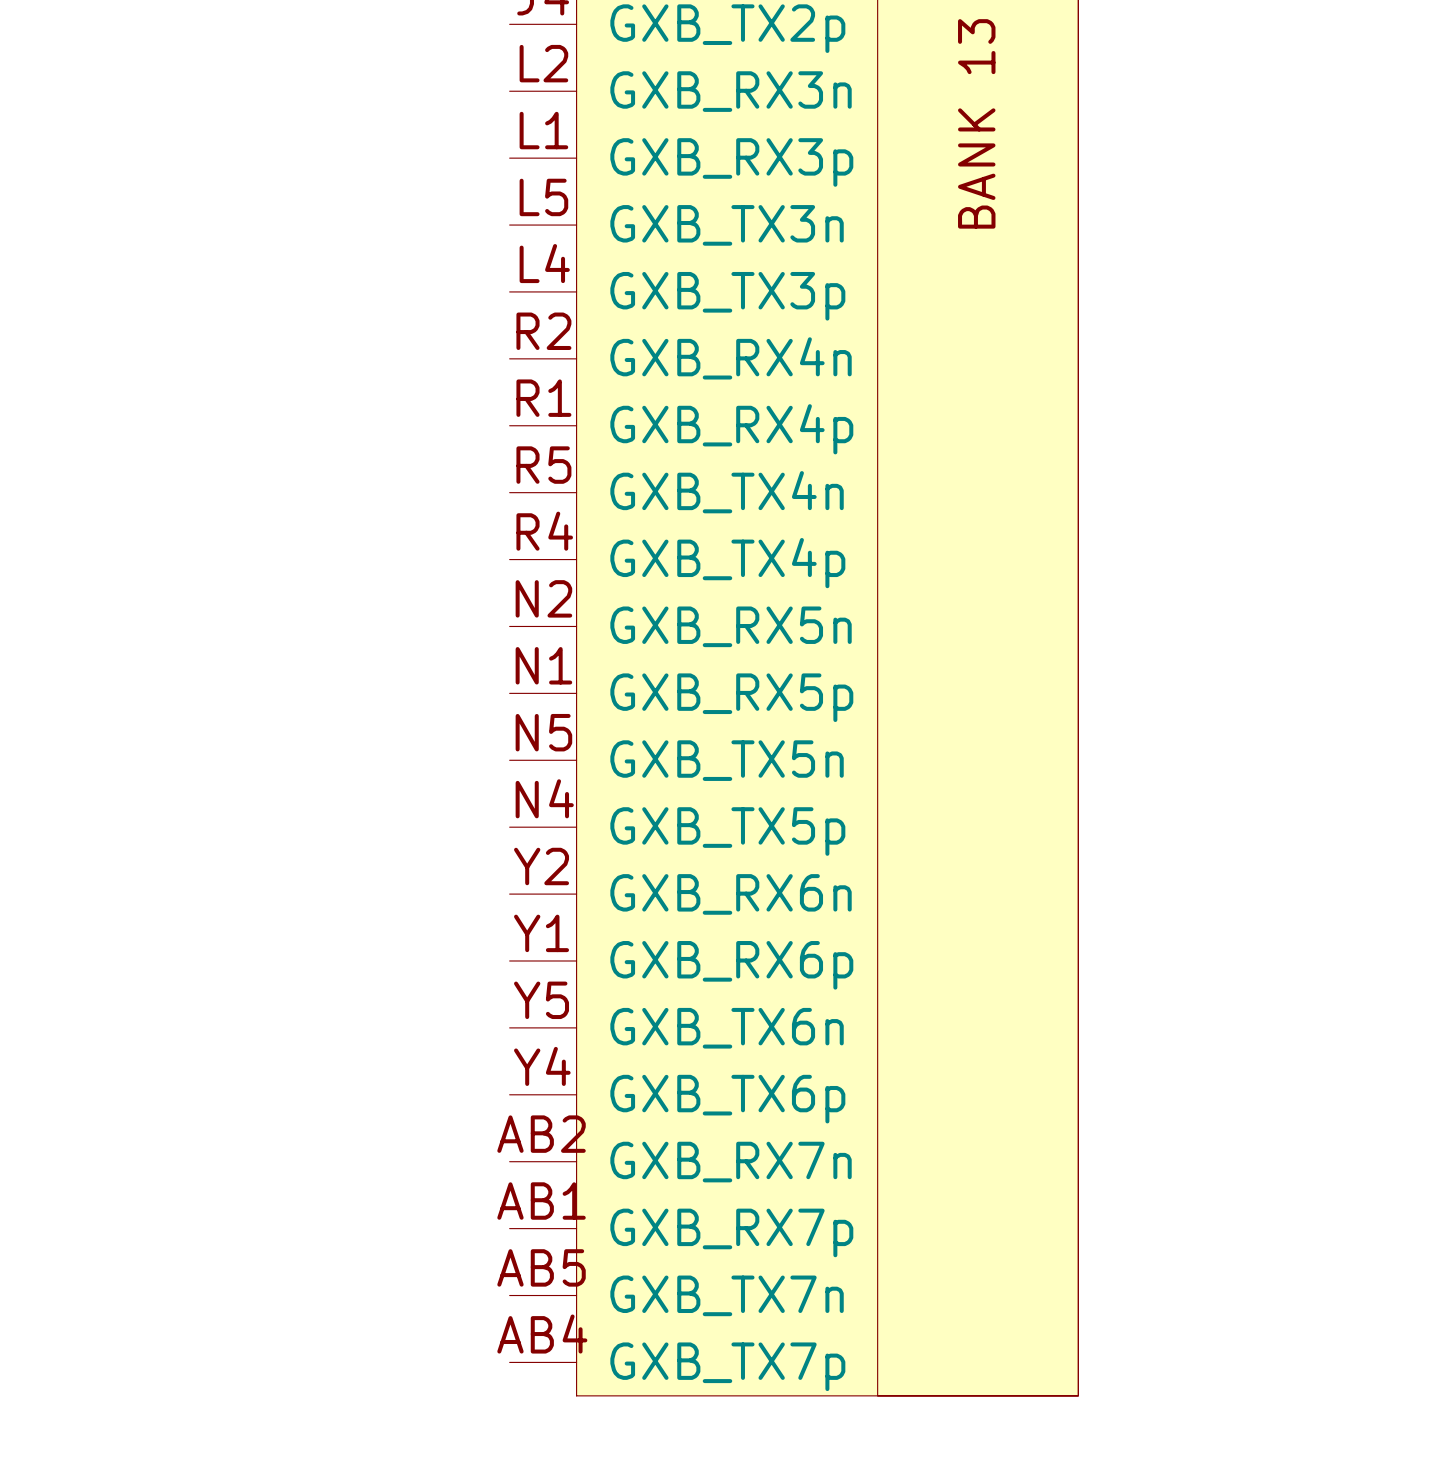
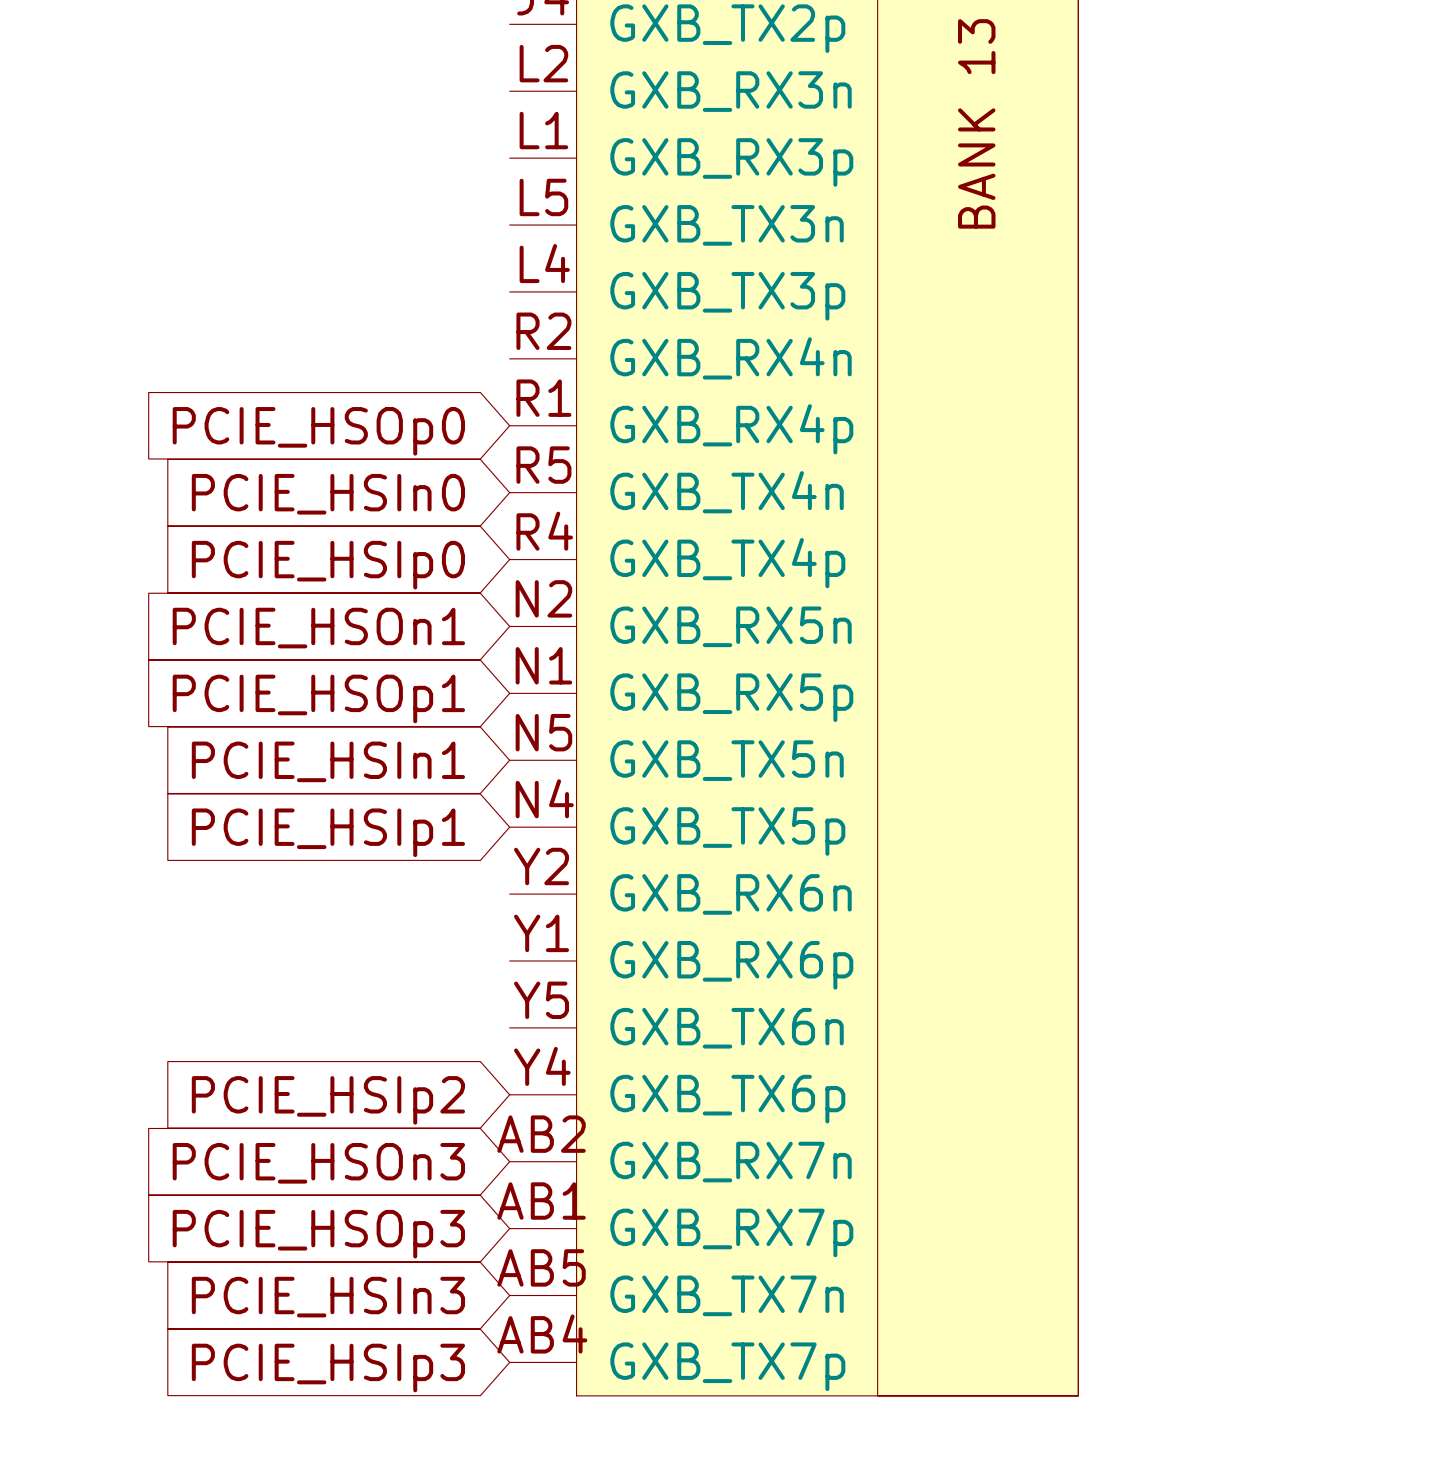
global label: none -> PCIE_HSOp0 (318, 431)
global label: none -> PCIE_HSIn0 (328, 494)
global label: none -> PCIE_HSIp0 (328, 565)
global label: none -> PCIE_HSOn1 (318, 628)
global label: none -> PCIE_HSOp1 (318, 698)
global label: none -> PCIE_HSIn1 (328, 761)
global label: none -> PCIE_HSIp1 (328, 832)
global label: none -> PCIE_HSIp2 (328, 1100)
global label: none -> PCIE_HSOn3 (318, 1163)
global label: none -> PCIE_HSOp3 (318, 1234)
global label: none -> PCIE_HSIn3 (328, 1297)
global label: none -> PCIE_HSIp3 (328, 1367)

